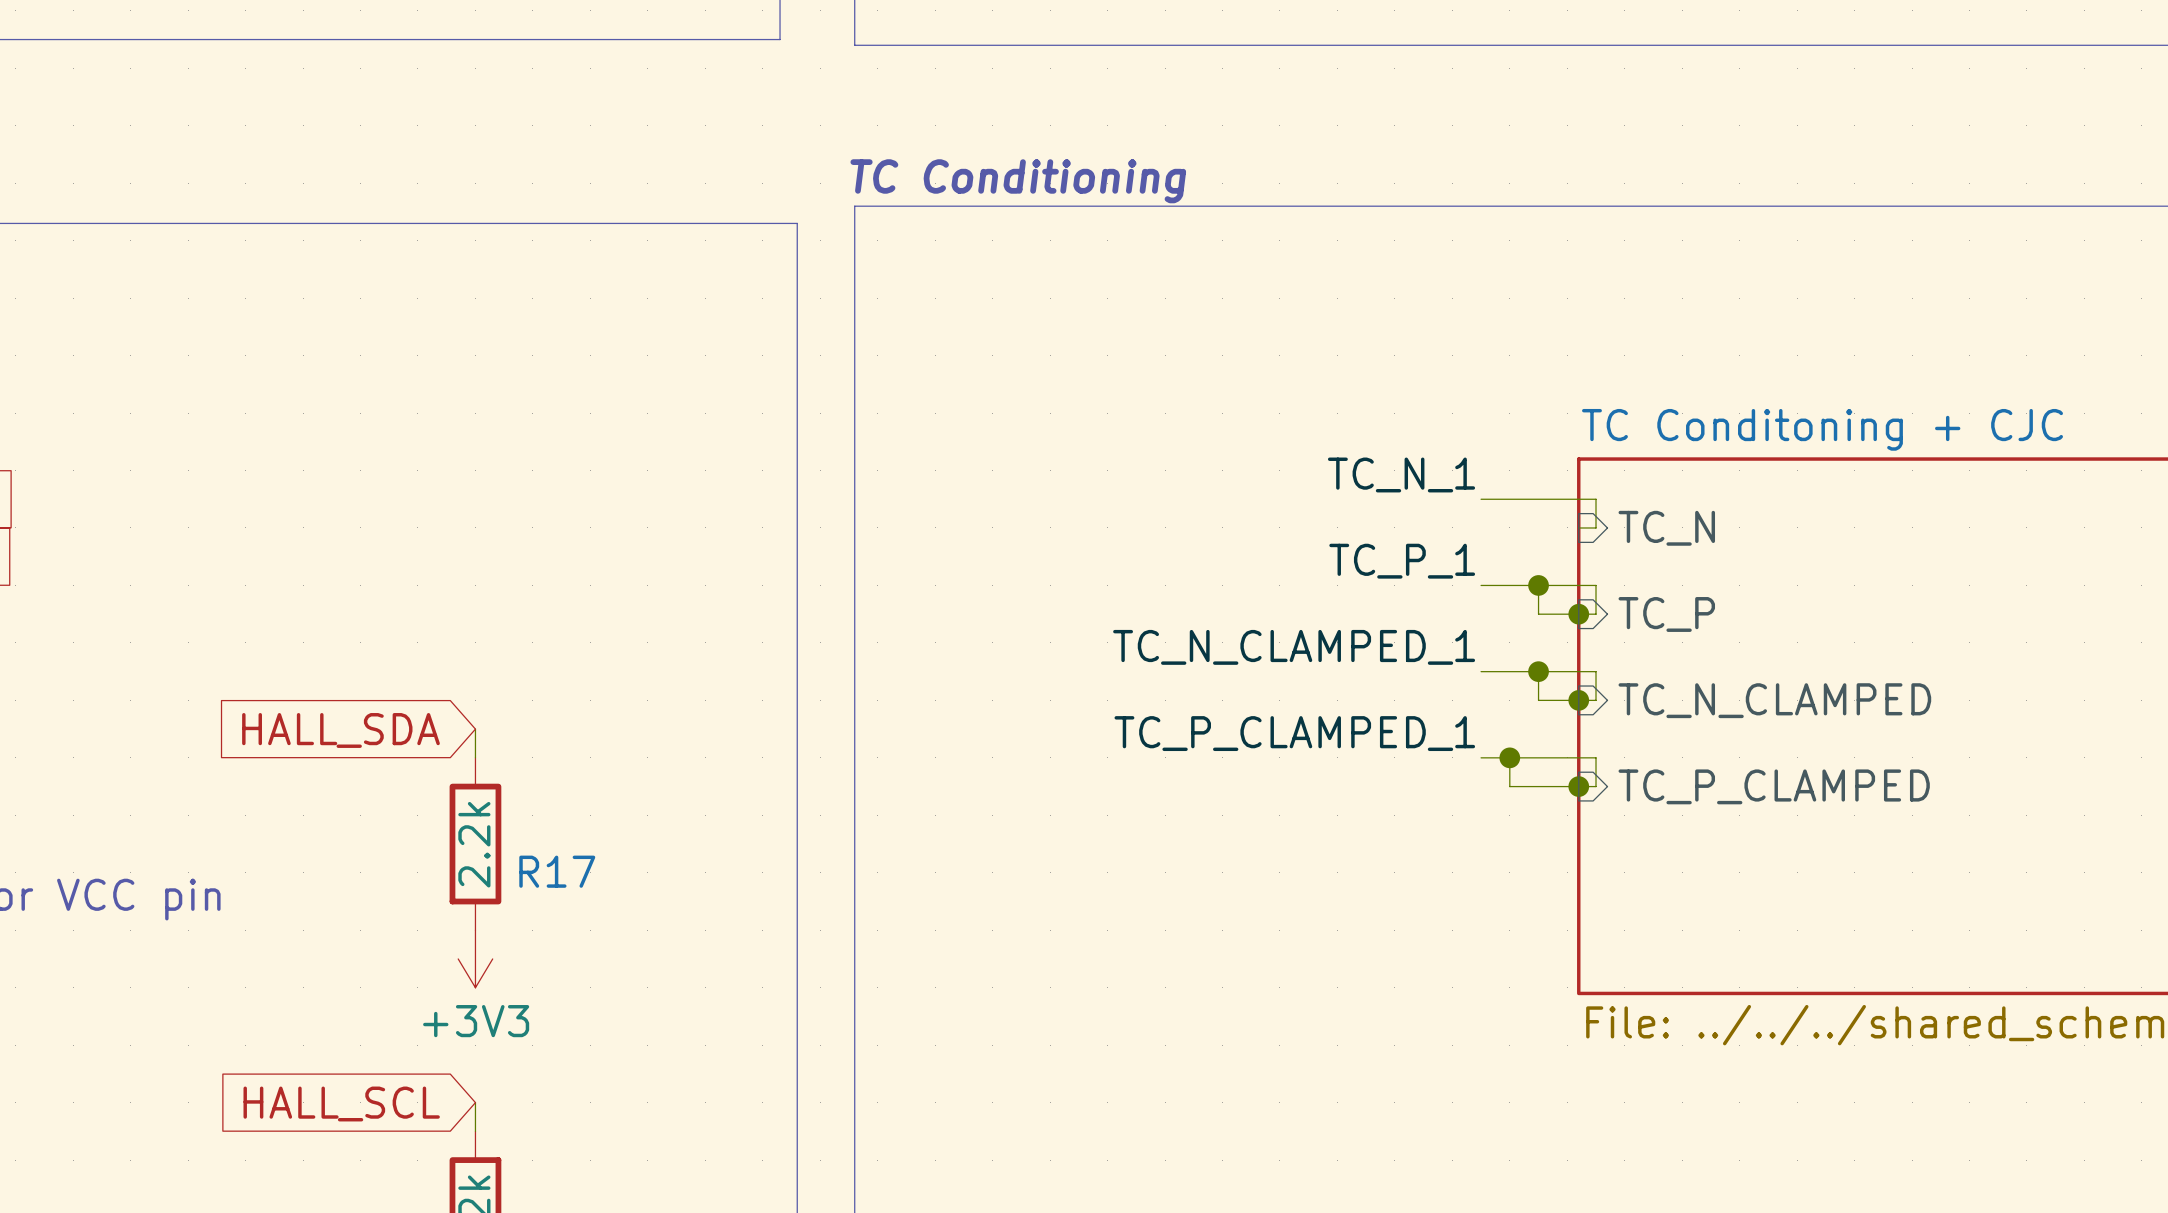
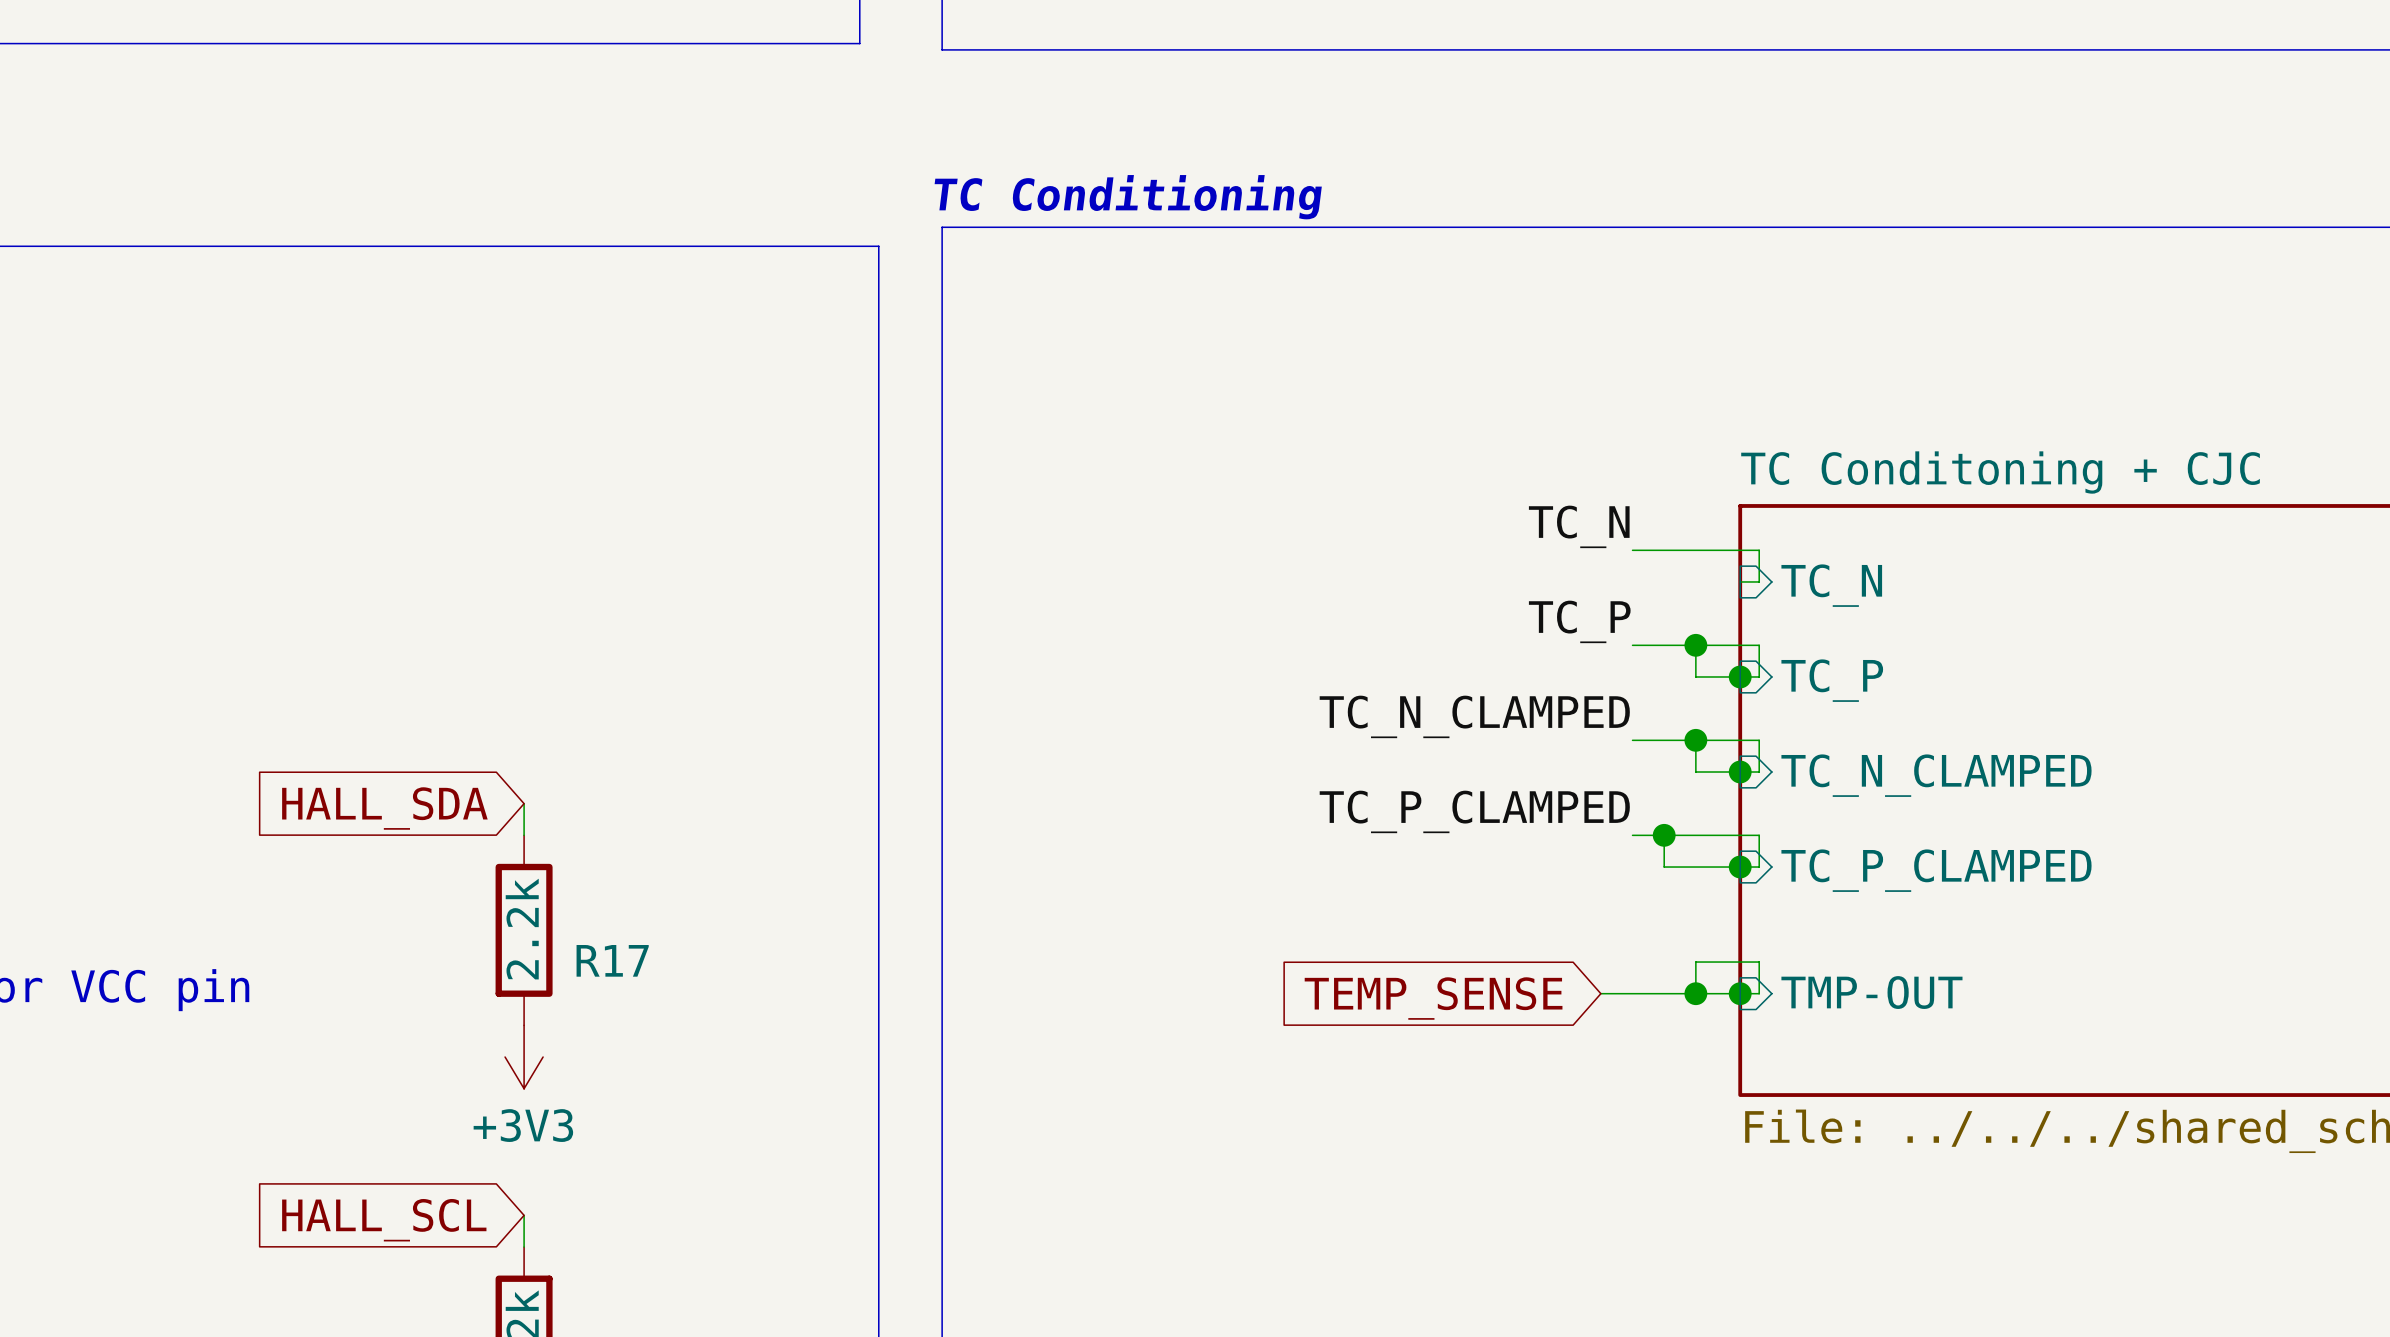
label: TC_N_1 (1401, 474) -> TC_N (1579, 526)
label: TC_P_1 (1402, 561) -> TC_P (1579, 621)
label: TC_N_CLAMPED_1 (1294, 647) -> TC_N_CLAMPED (1474, 716)
label: TC_P_CLAMPED_1 (1294, 733) -> TC_P_CLAMPED (1474, 811)
sheet pin: none -> TMP-OUT (1871, 992)
wire: none -> (1600, 993) (1759, 993) (1759, 962) (1695, 962) (1695, 993)
junction: none -> (1695, 993)
junction: none -> (1740, 993)
global label: none -> TEMP_SENSE (1433, 998)

